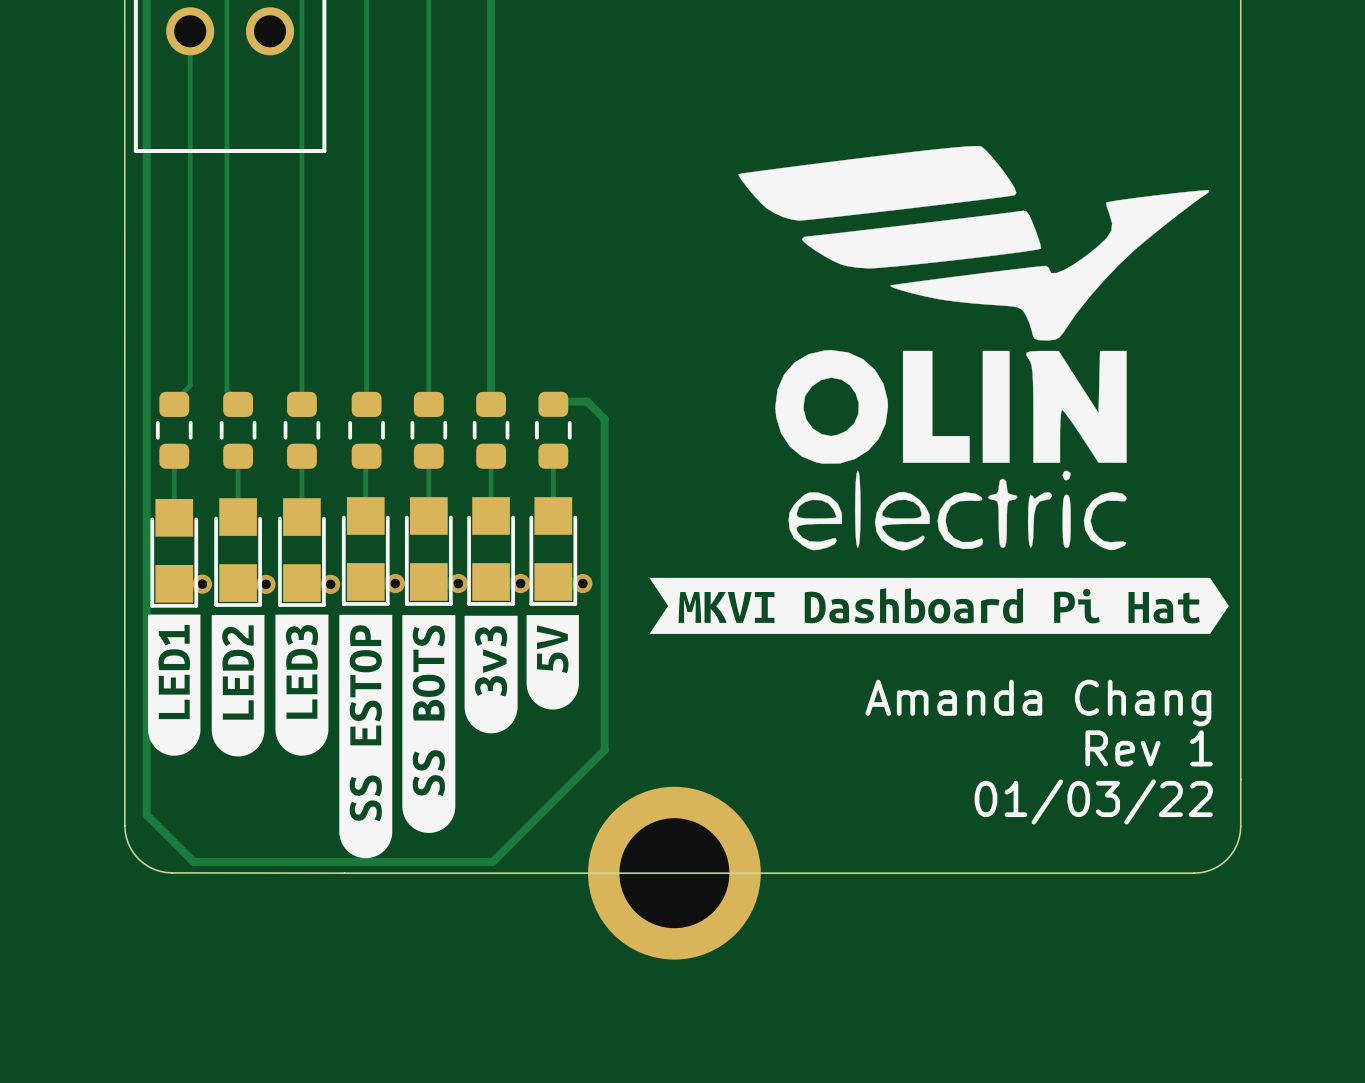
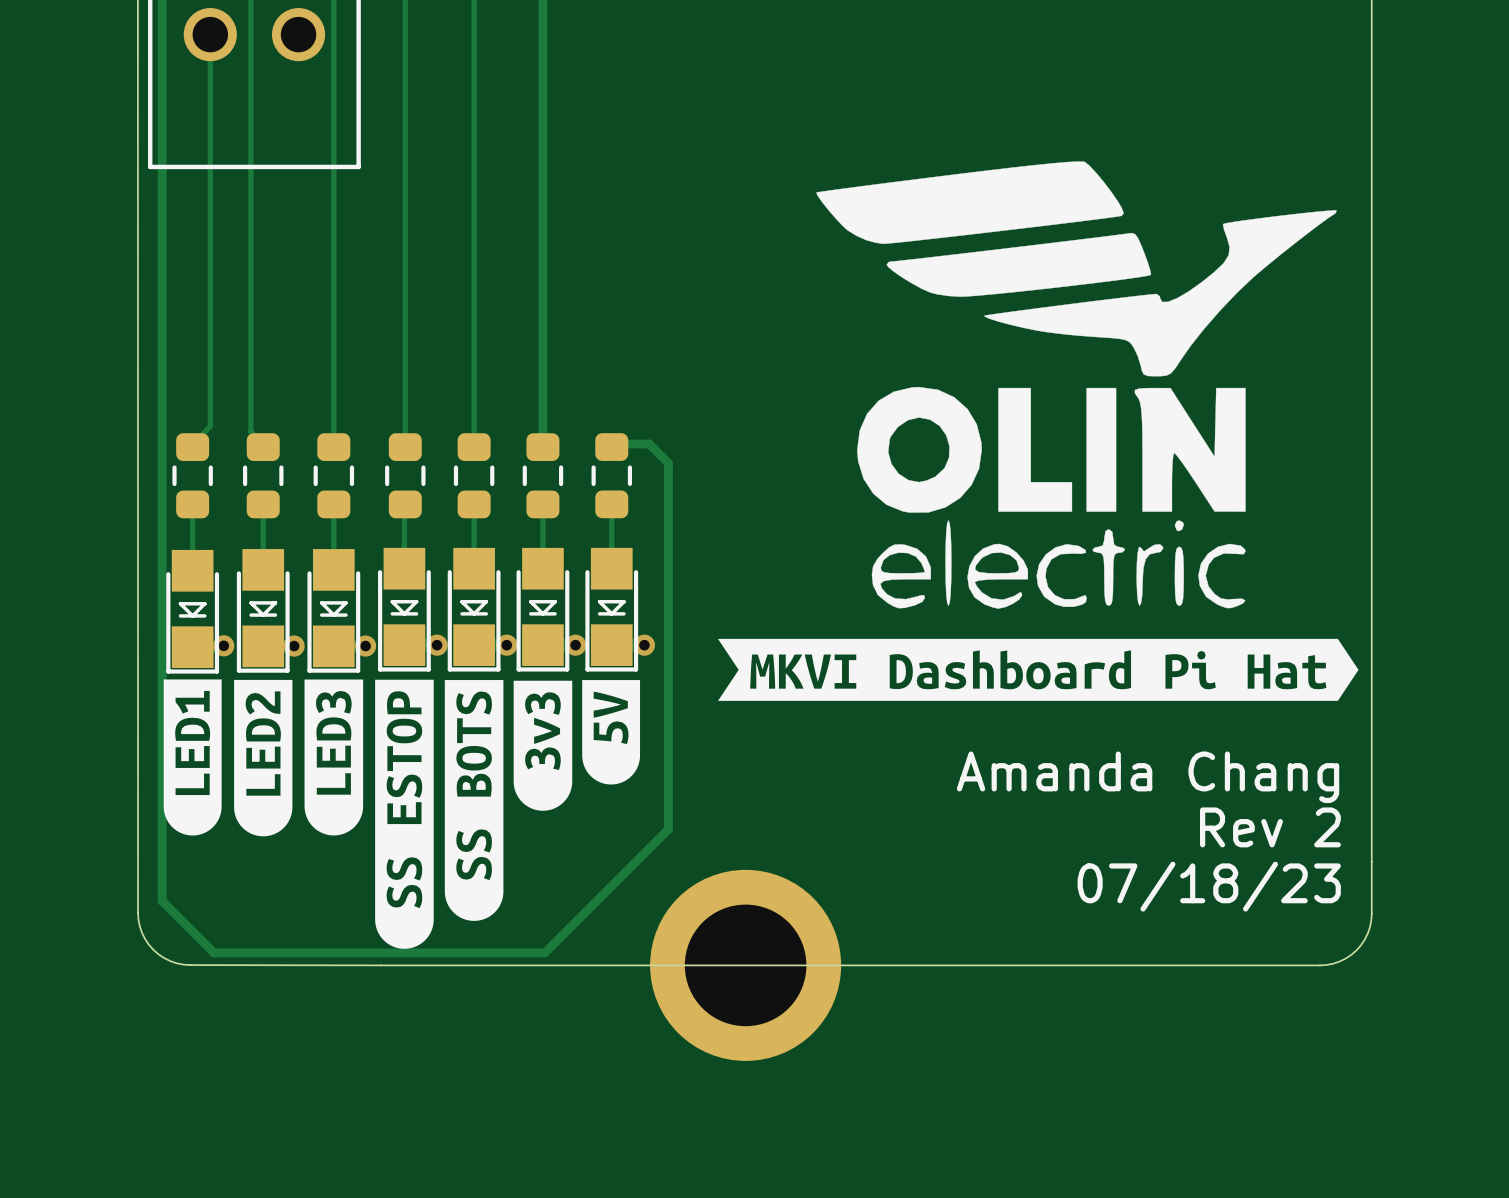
part footprint: [341, 497, 390, 606] -> [378, 547, 431, 672]
part footprint: [404, 497, 453, 606] -> [447, 547, 501, 672]
part footprint: [467, 497, 515, 606] -> [516, 547, 570, 672]
part footprint: [529, 497, 578, 606] -> [585, 547, 639, 672]
part footprint: [150, 498, 199, 608] -> [166, 549, 220, 674]
part footprint: [214, 498, 262, 607] -> [236, 549, 290, 673]
part footprint: [278, 498, 326, 607] -> [307, 549, 361, 673]
text: Rev 1 (1149, 748) -> Rev 2 (1270, 827)
text: 01/03/22 (1093, 801) -> 07/18/23 (1209, 886)

